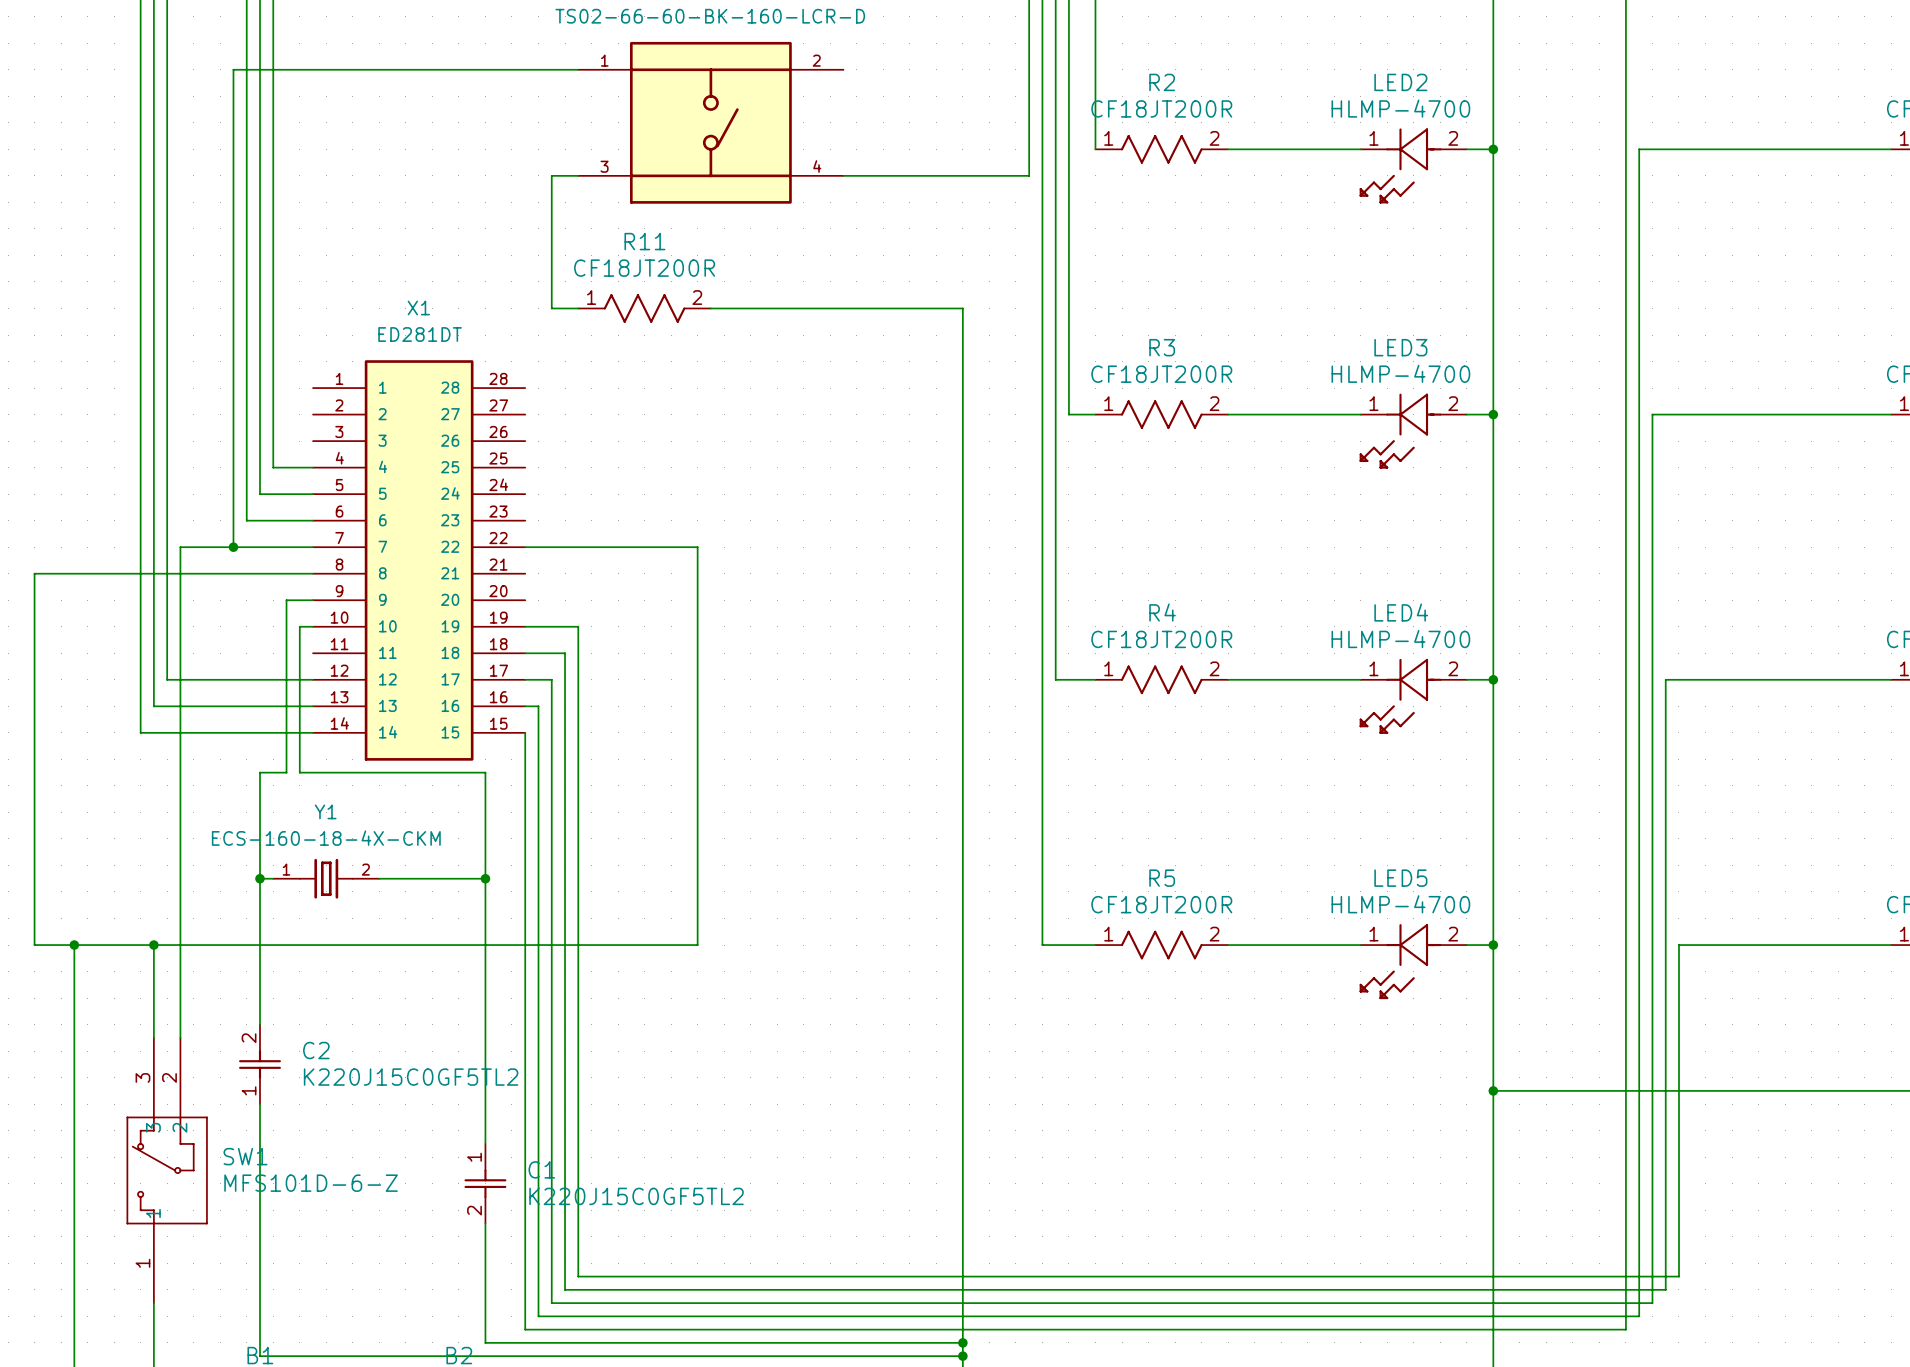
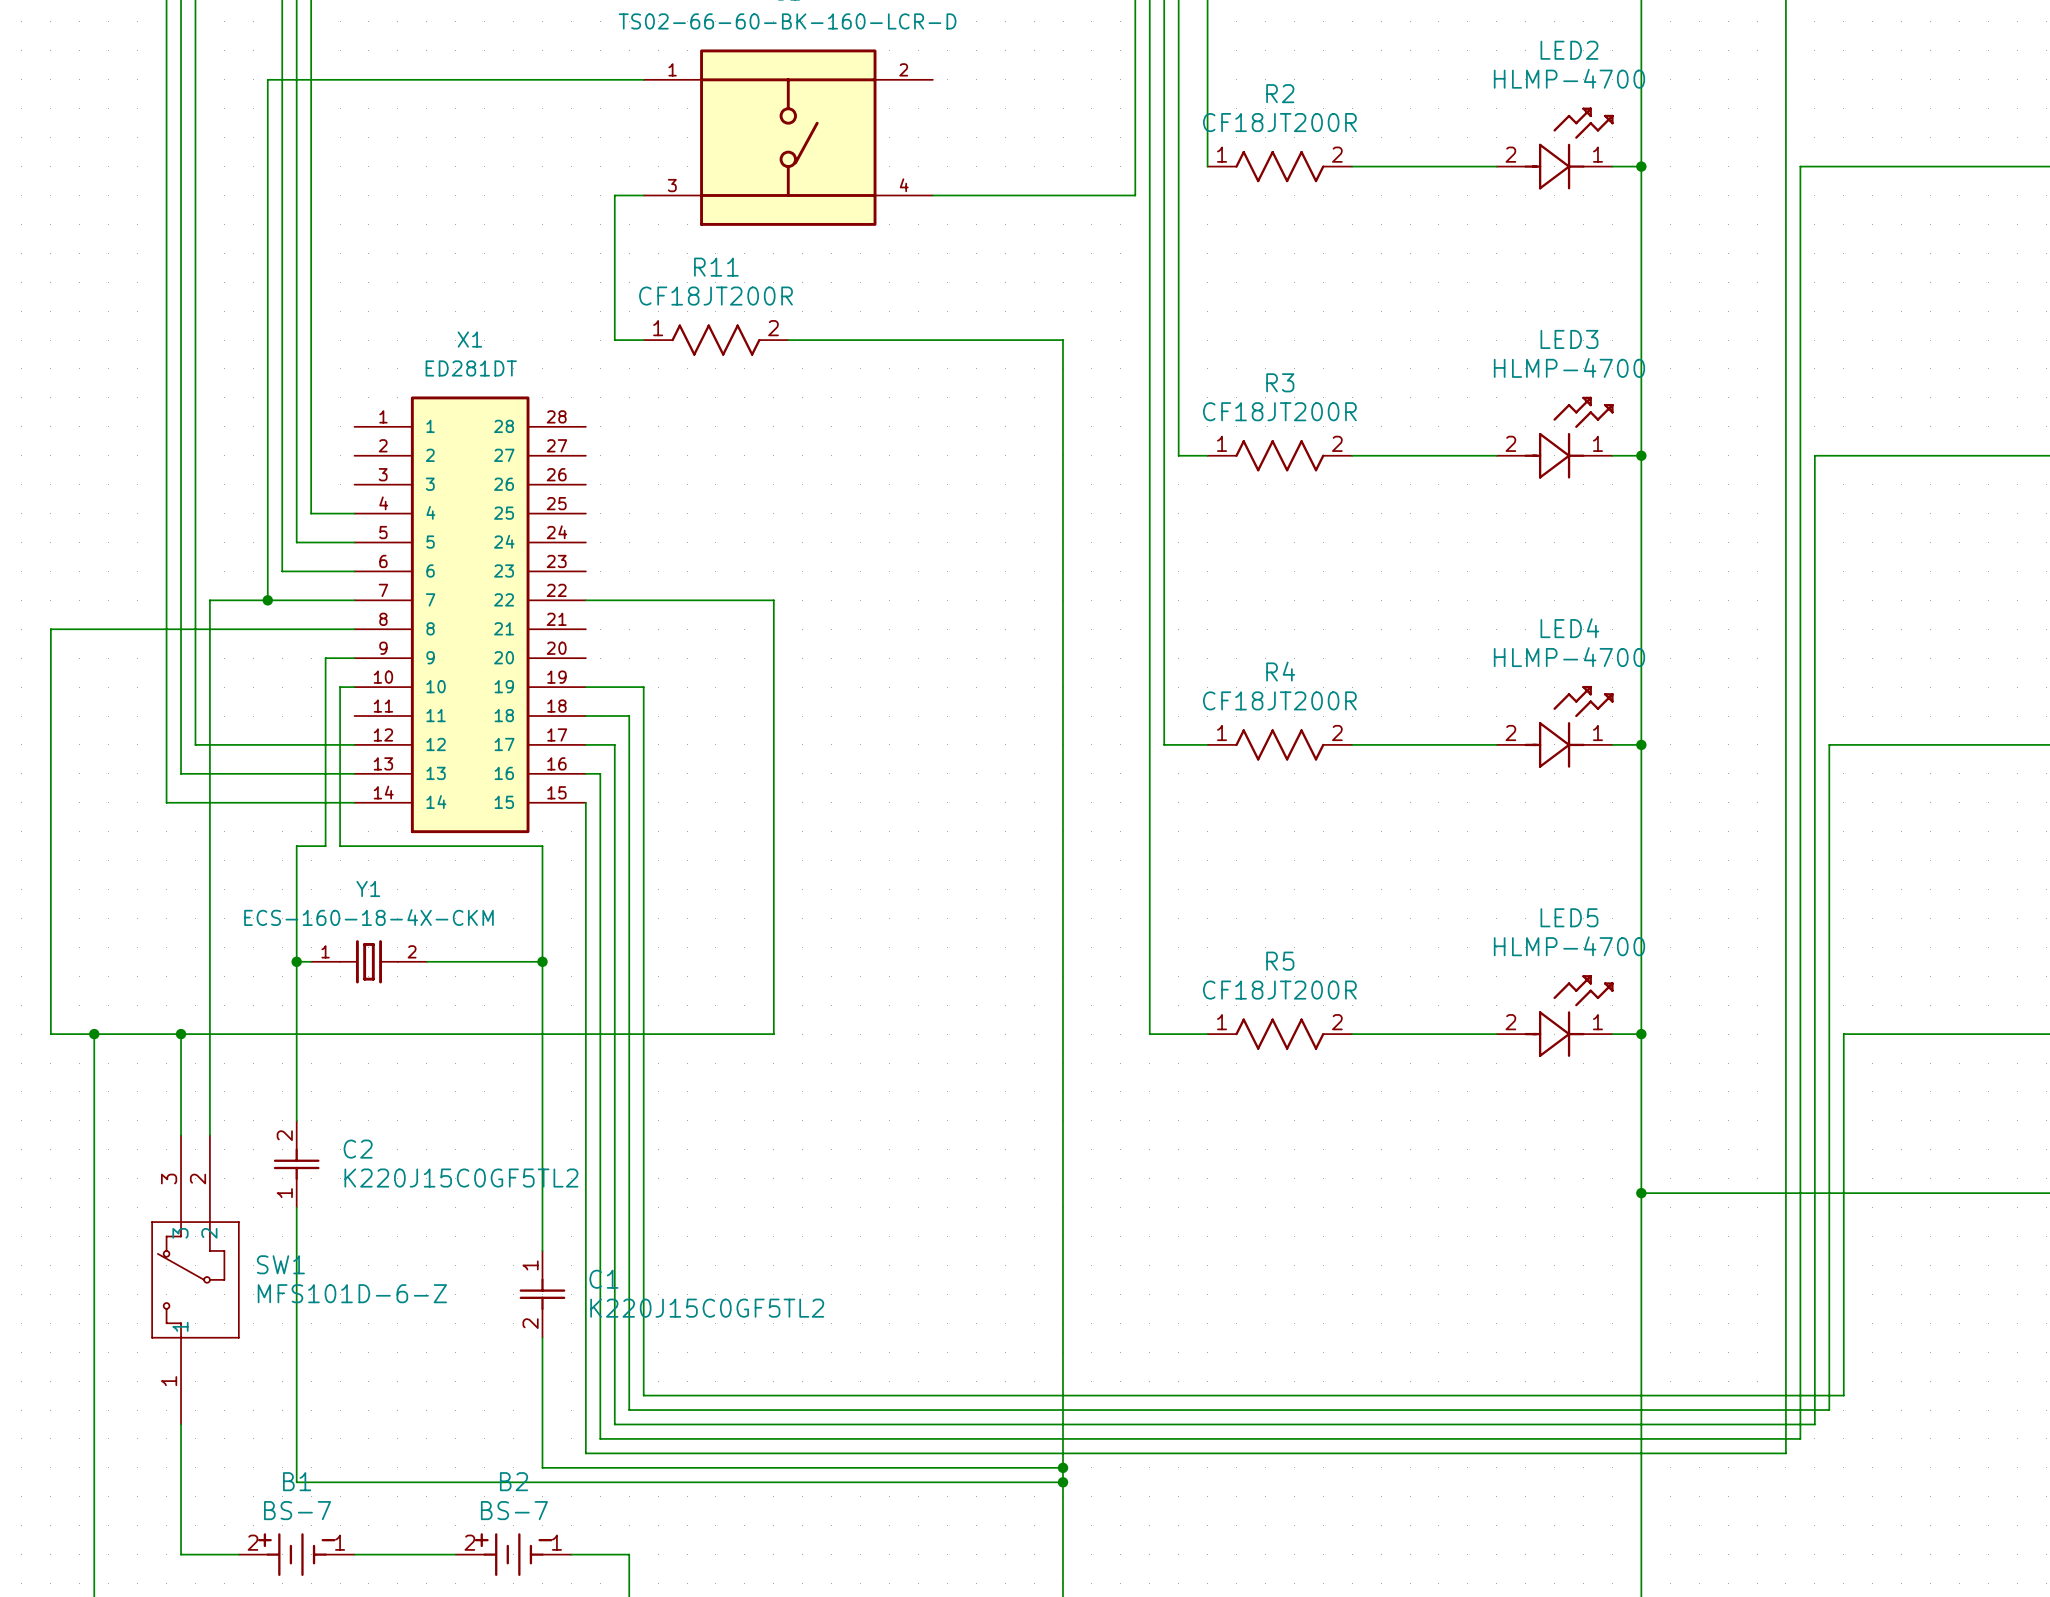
LED2 name position: LED2 (1400, 82) -> LED2 (1569, 50)
LED2 value position: HLMP-4700 (1400, 108) -> HLMP-4700 (1569, 78)
LED2 rotation: 0° (1400, 165) -> 180° (1569, 148)
LED3 name position: LED3 (1400, 347) -> LED3 (1569, 339)
LED3 value position: HLMP-4700 (1400, 373) -> HLMP-4700 (1569, 367)
LED3 rotation: 0° (1400, 431) -> 180° (1569, 437)
LED4 name position: LED4 (1401, 612) -> LED4 (1569, 628)
LED4 value position: HLMP-4700 (1400, 639) -> HLMP-4700 (1569, 657)
LED4 rotation: 0° (1400, 696) -> 180° (1569, 726)
LED5 name position: LED5 (1400, 878) -> LED5 (1569, 917)
LED5 value position: HLMP-4700 (1400, 904) -> HLMP-4700 (1569, 946)
LED5 rotation: 0° (1400, 961) -> 180° (1569, 1016)

